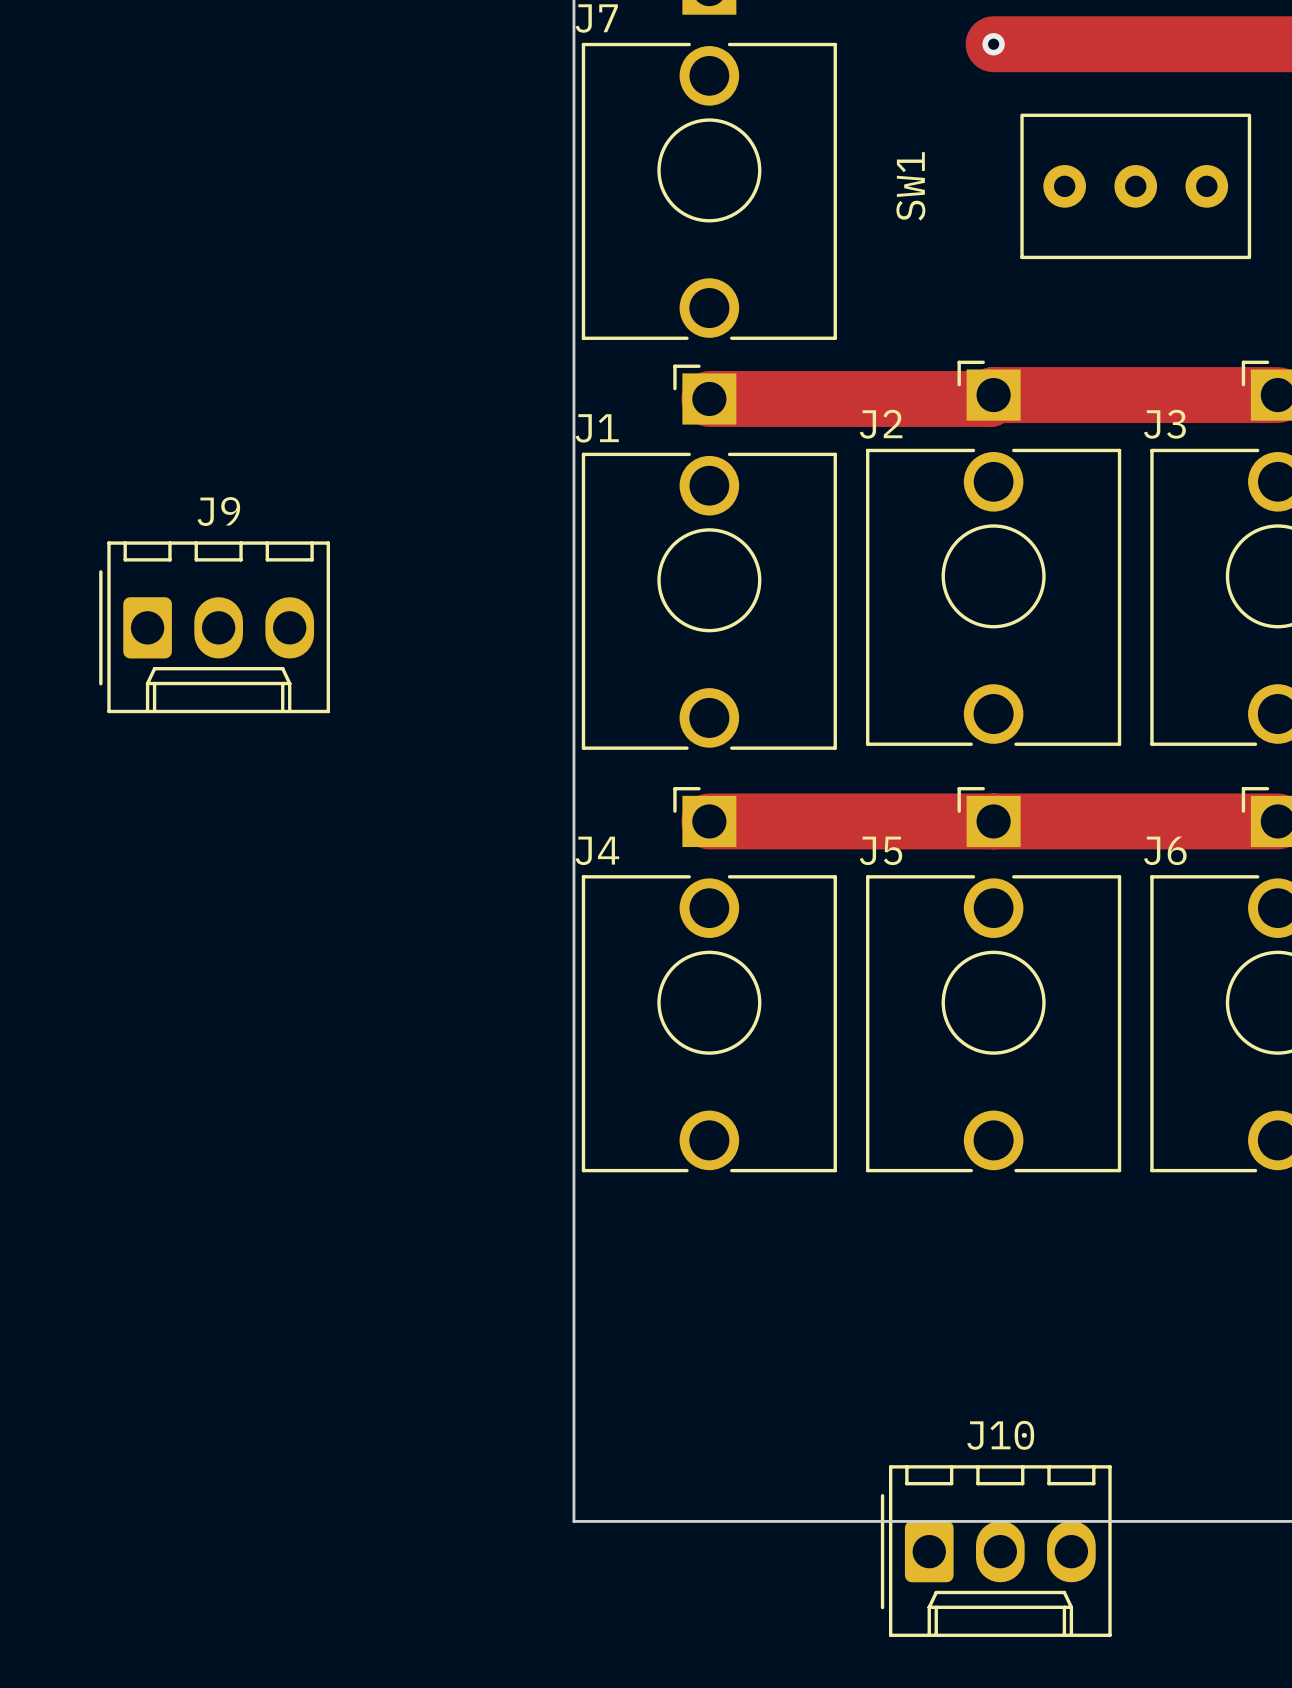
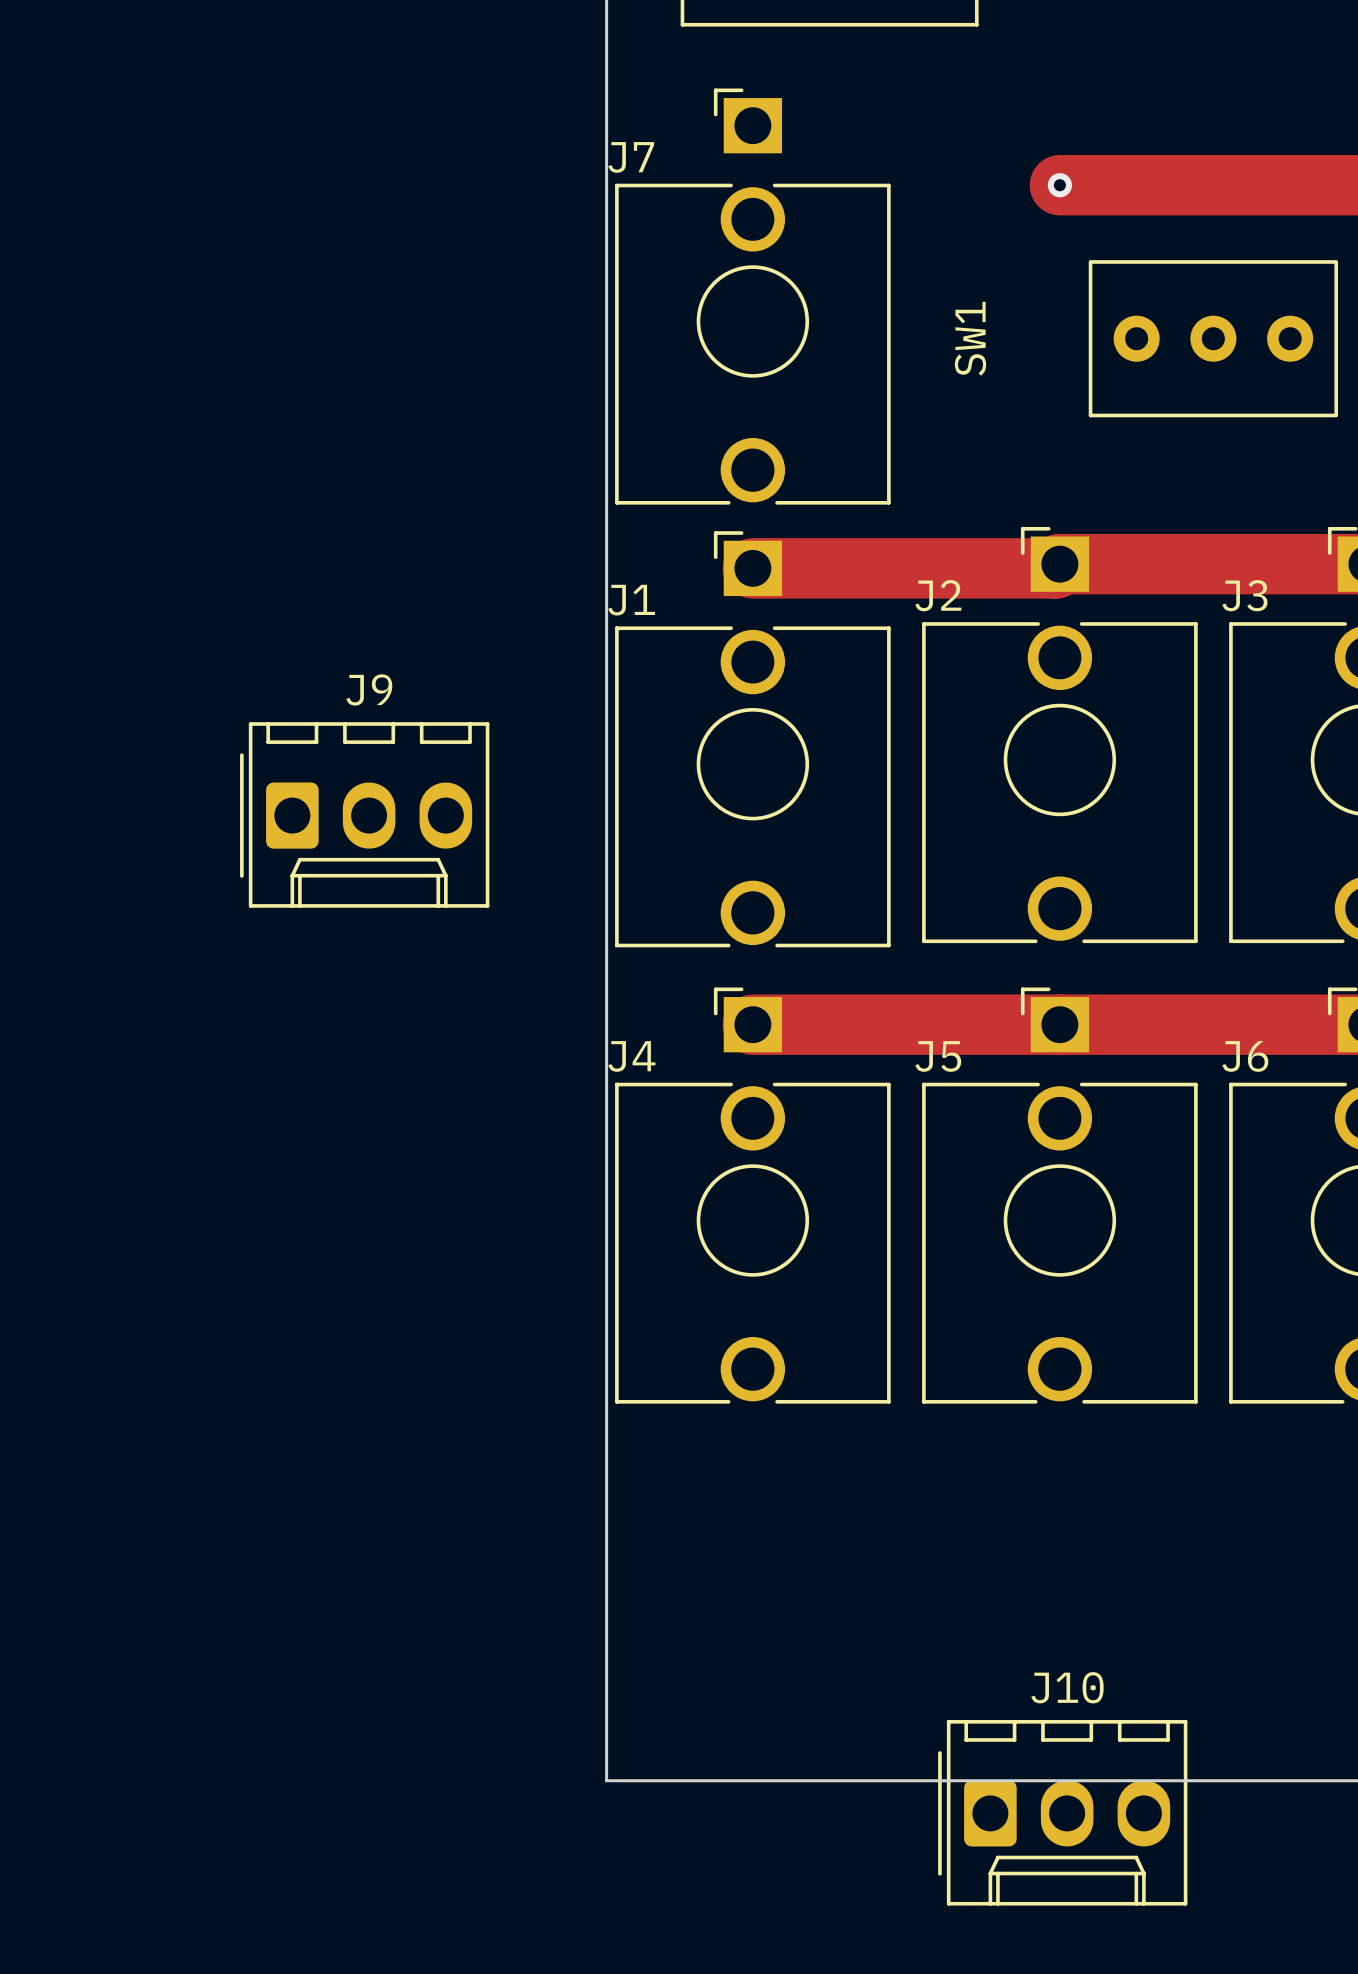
J9 position: (214, 627) -> (364, 814)

